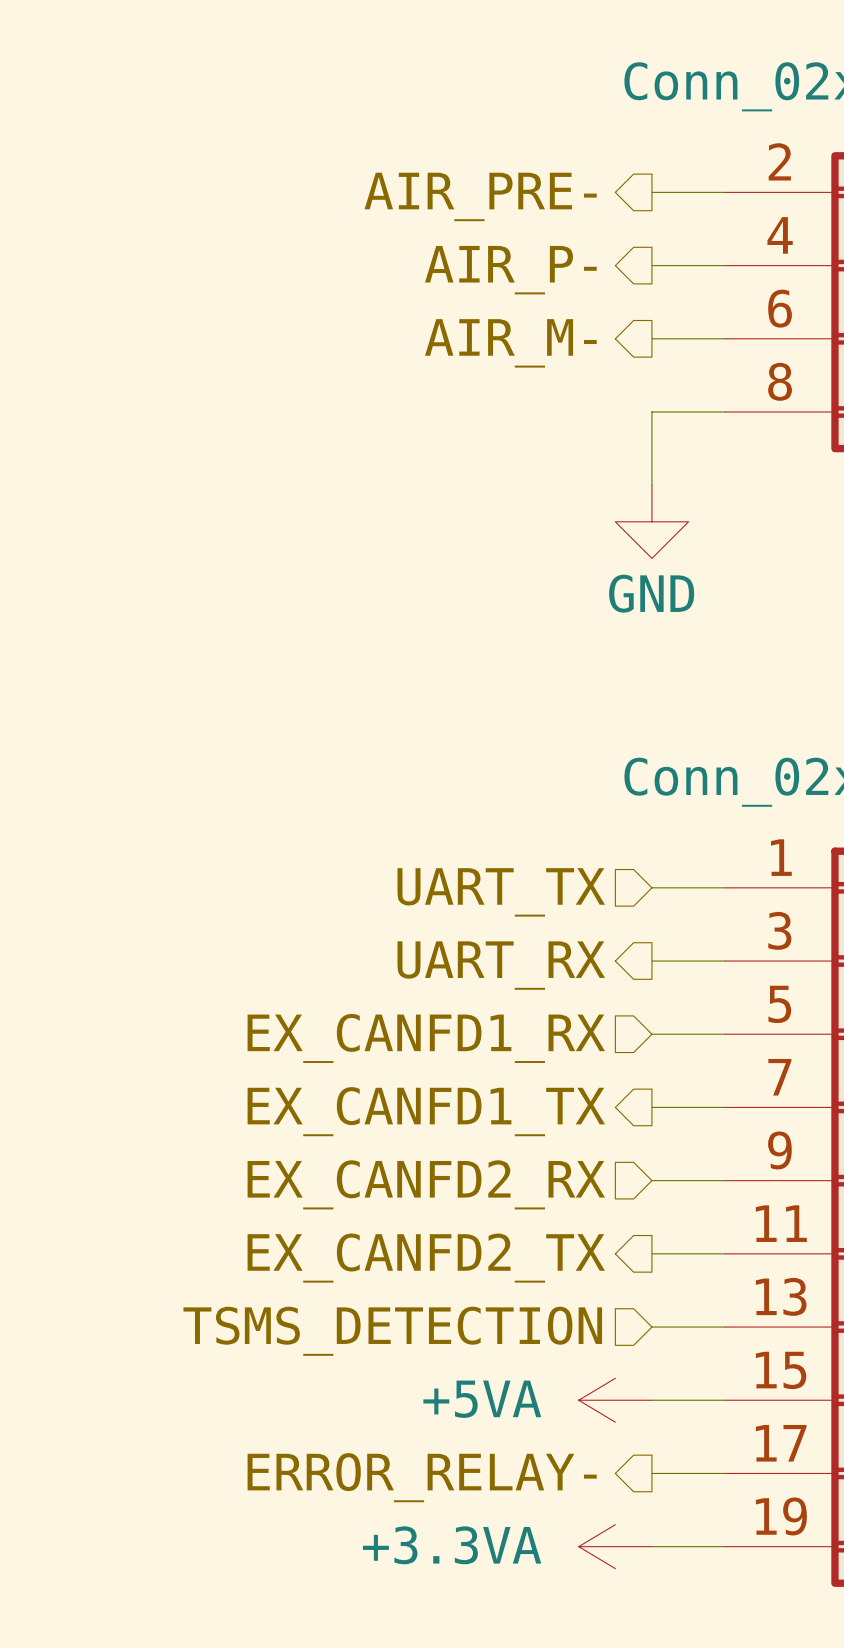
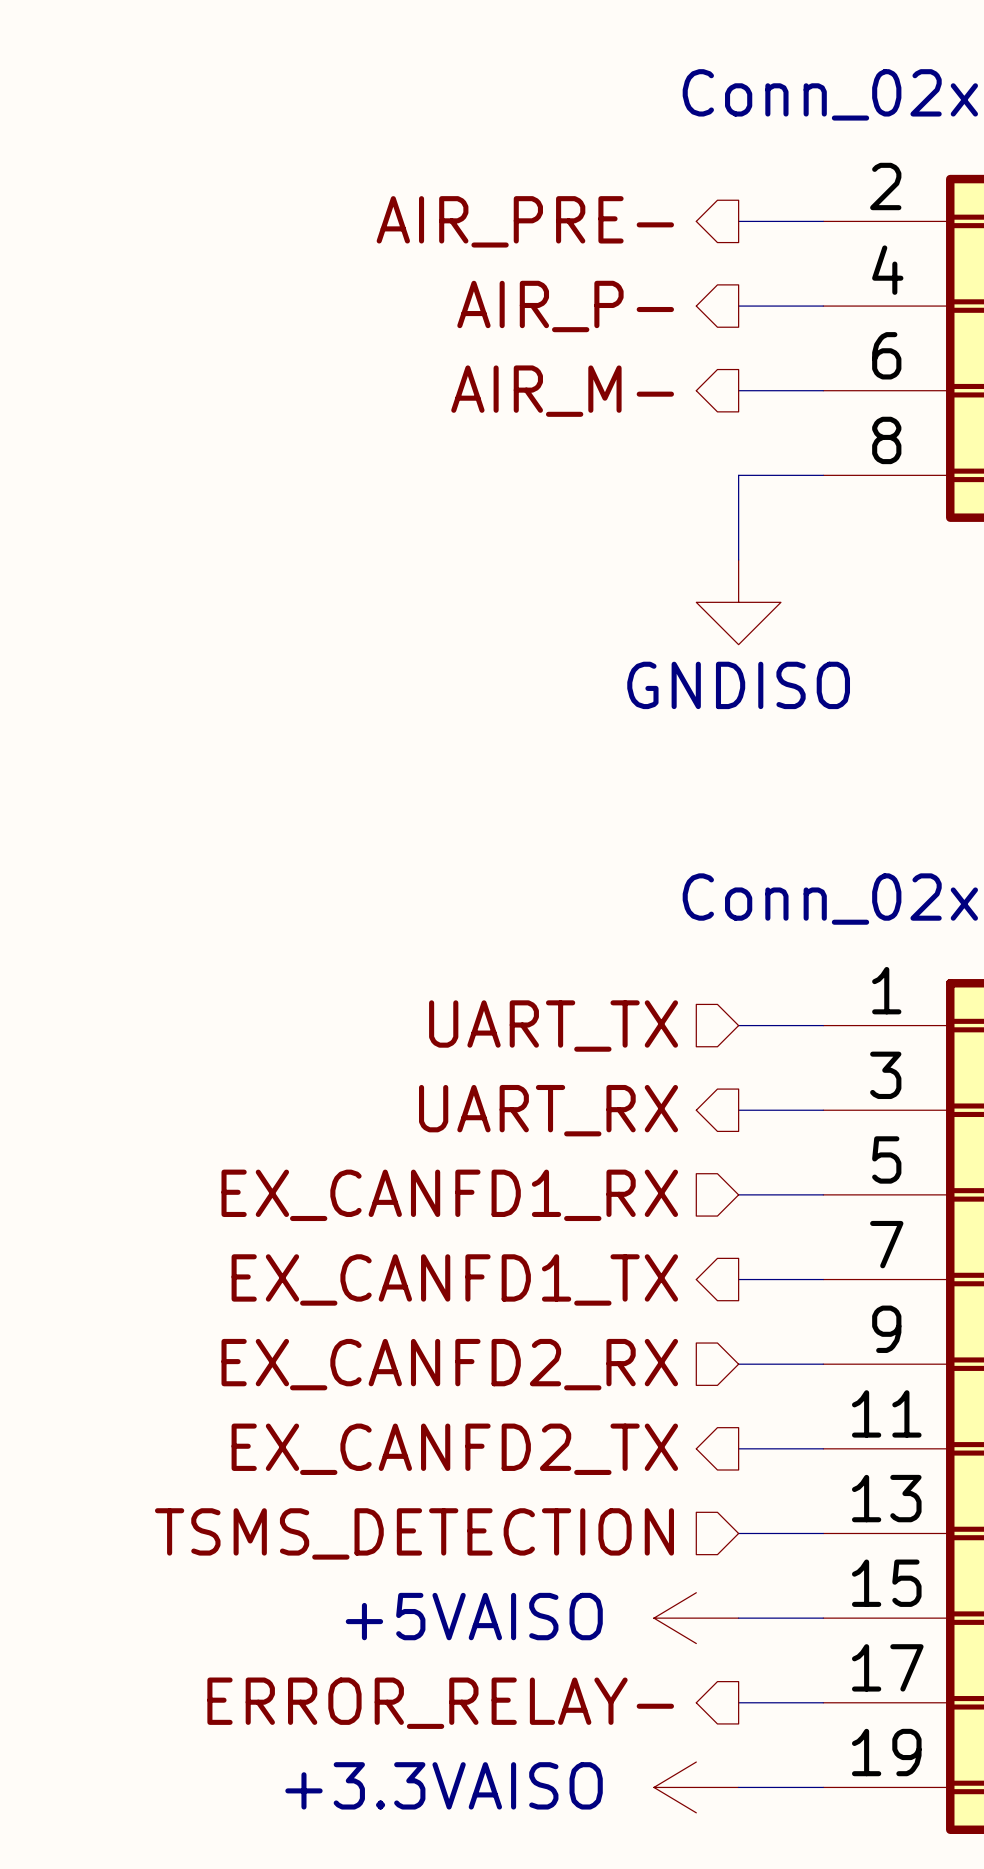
power symbol: GND (651, 521) -> GNDISO (738, 602)
power symbol: +5VA (615, 1400) -> +5VAISO (696, 1618)
power symbol: +3.3VA (615, 1546) -> +3.3VAISO (696, 1787)

